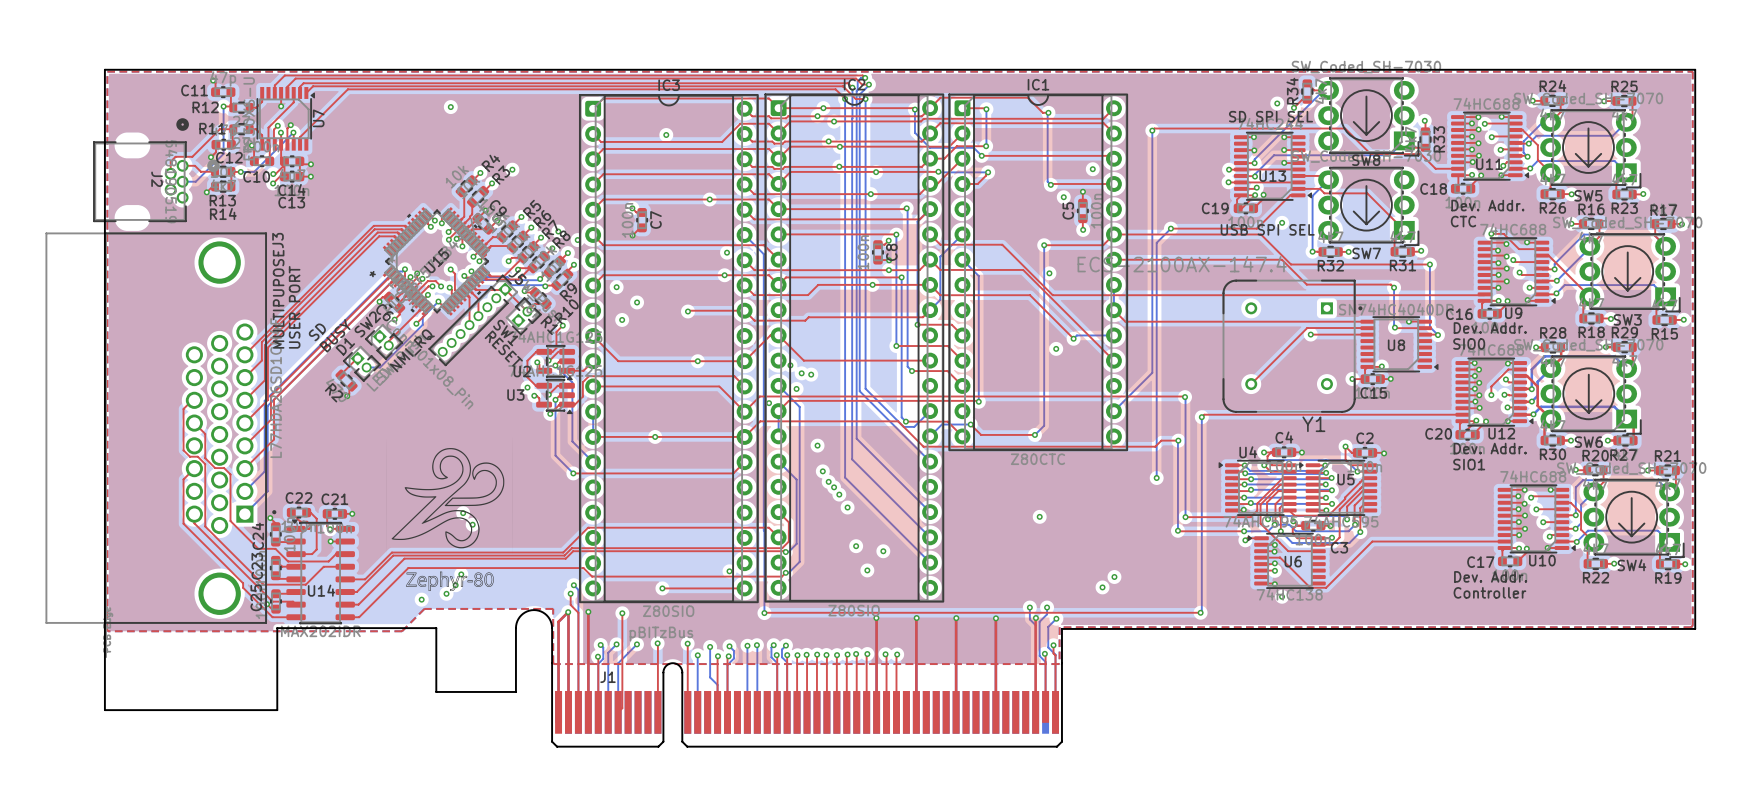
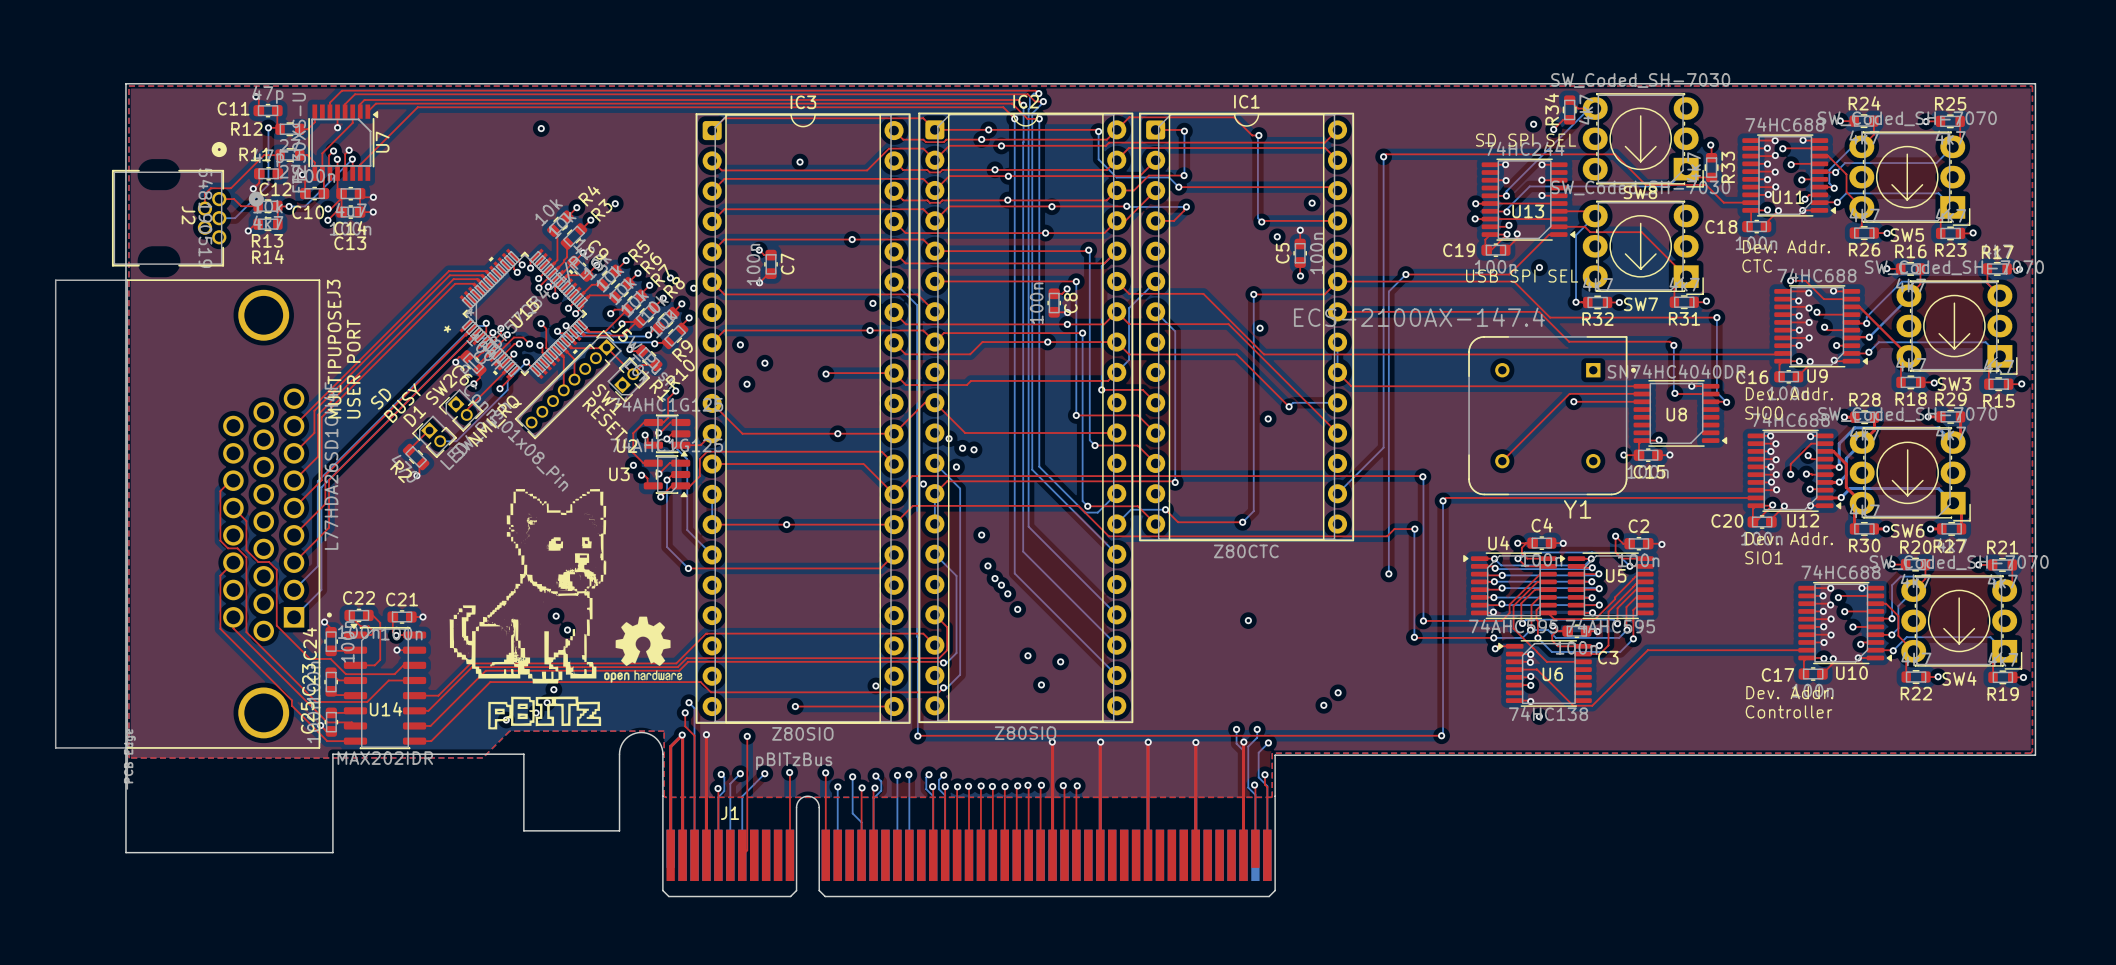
drawing: none -> [449, 489, 683, 730]
drawing: [386, 437, 513, 592] -> none

